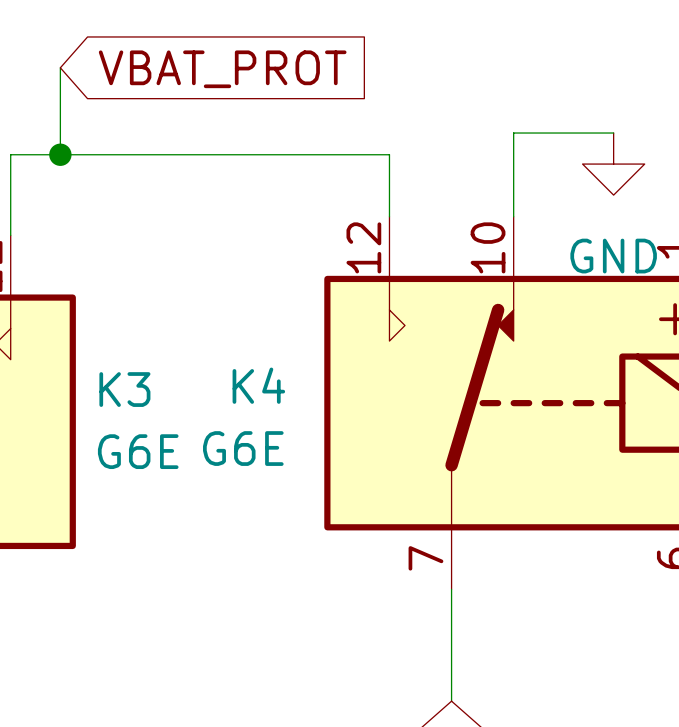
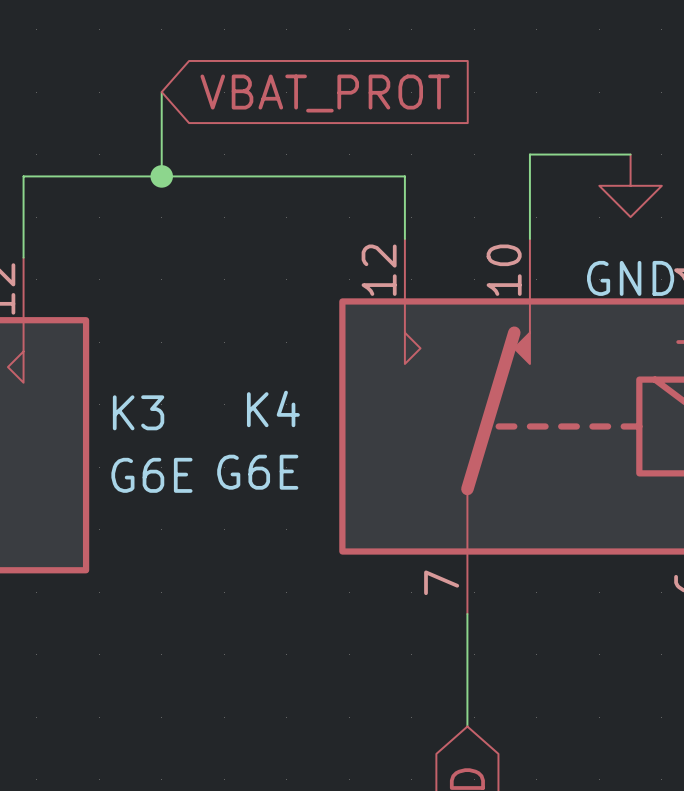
wire: (60, 67) (60, 154) -> none
global label position: VBAT_PROT (222, 69) -> VBAT_PROT (325, 93)
wire: none -> (161, 92) (161, 176)
junction position: (60, 154) -> (161, 176)

